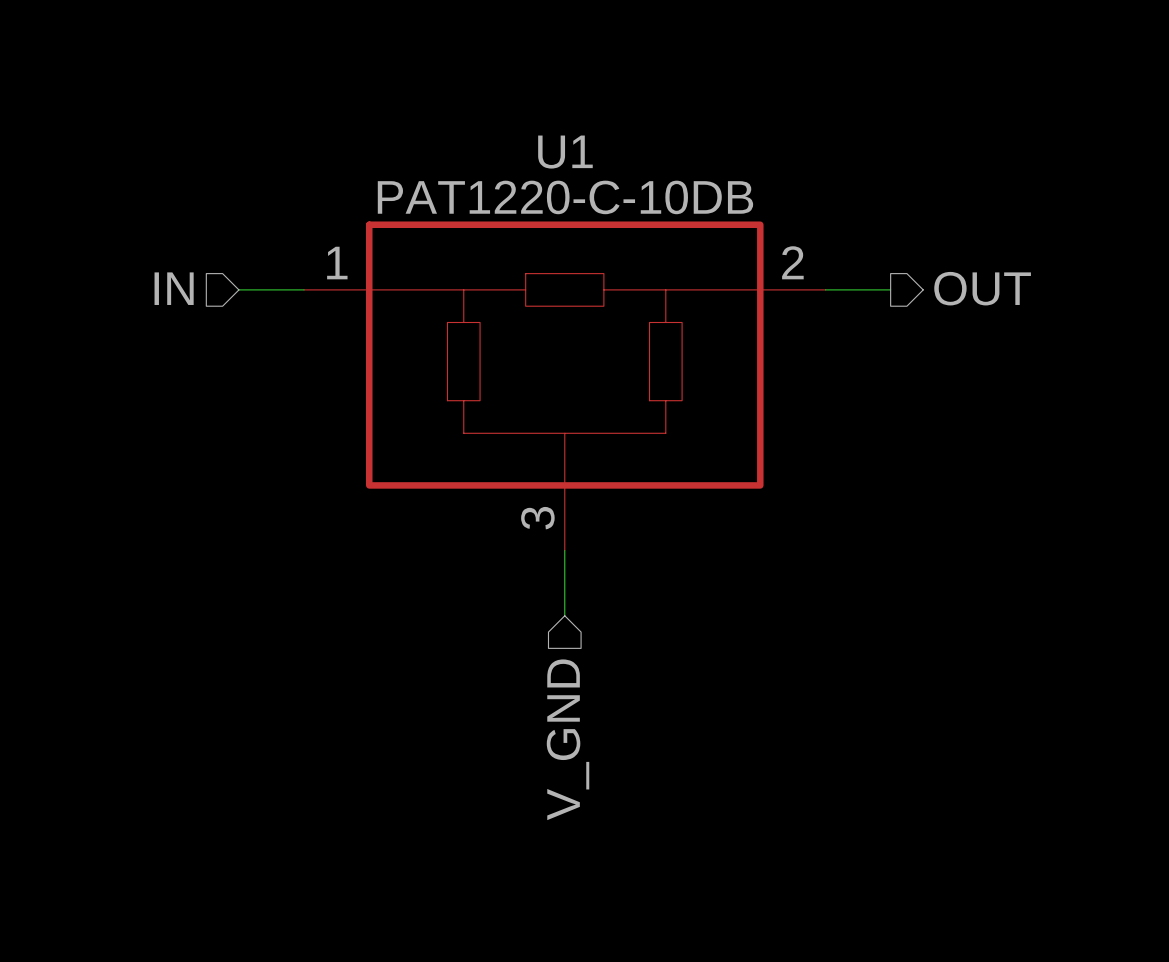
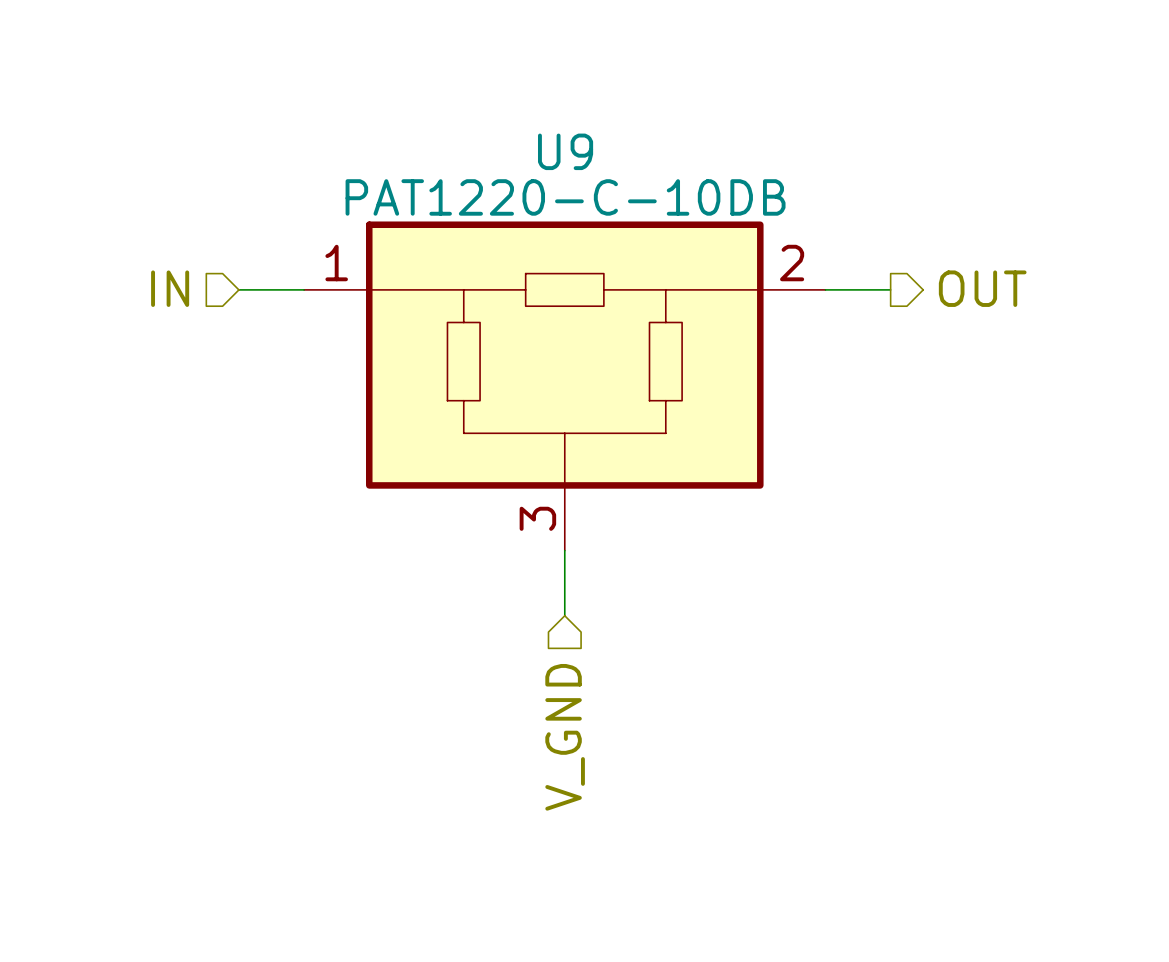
U1 name: U1 (565, 152) -> U9 (565, 151)

